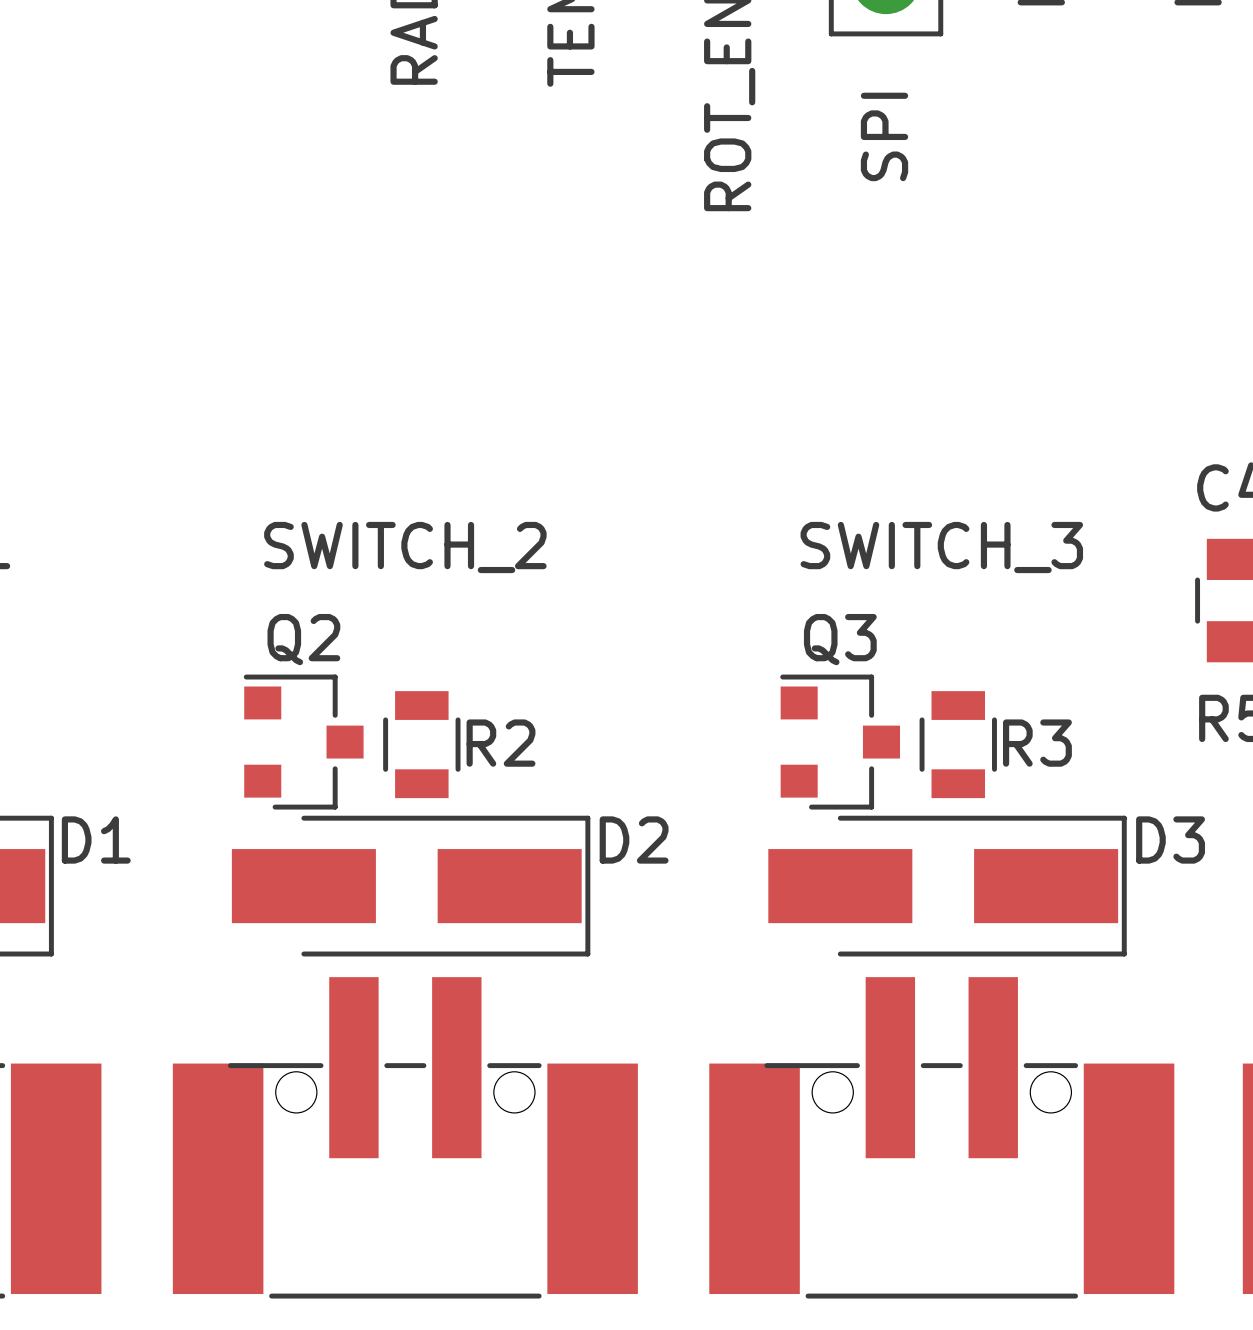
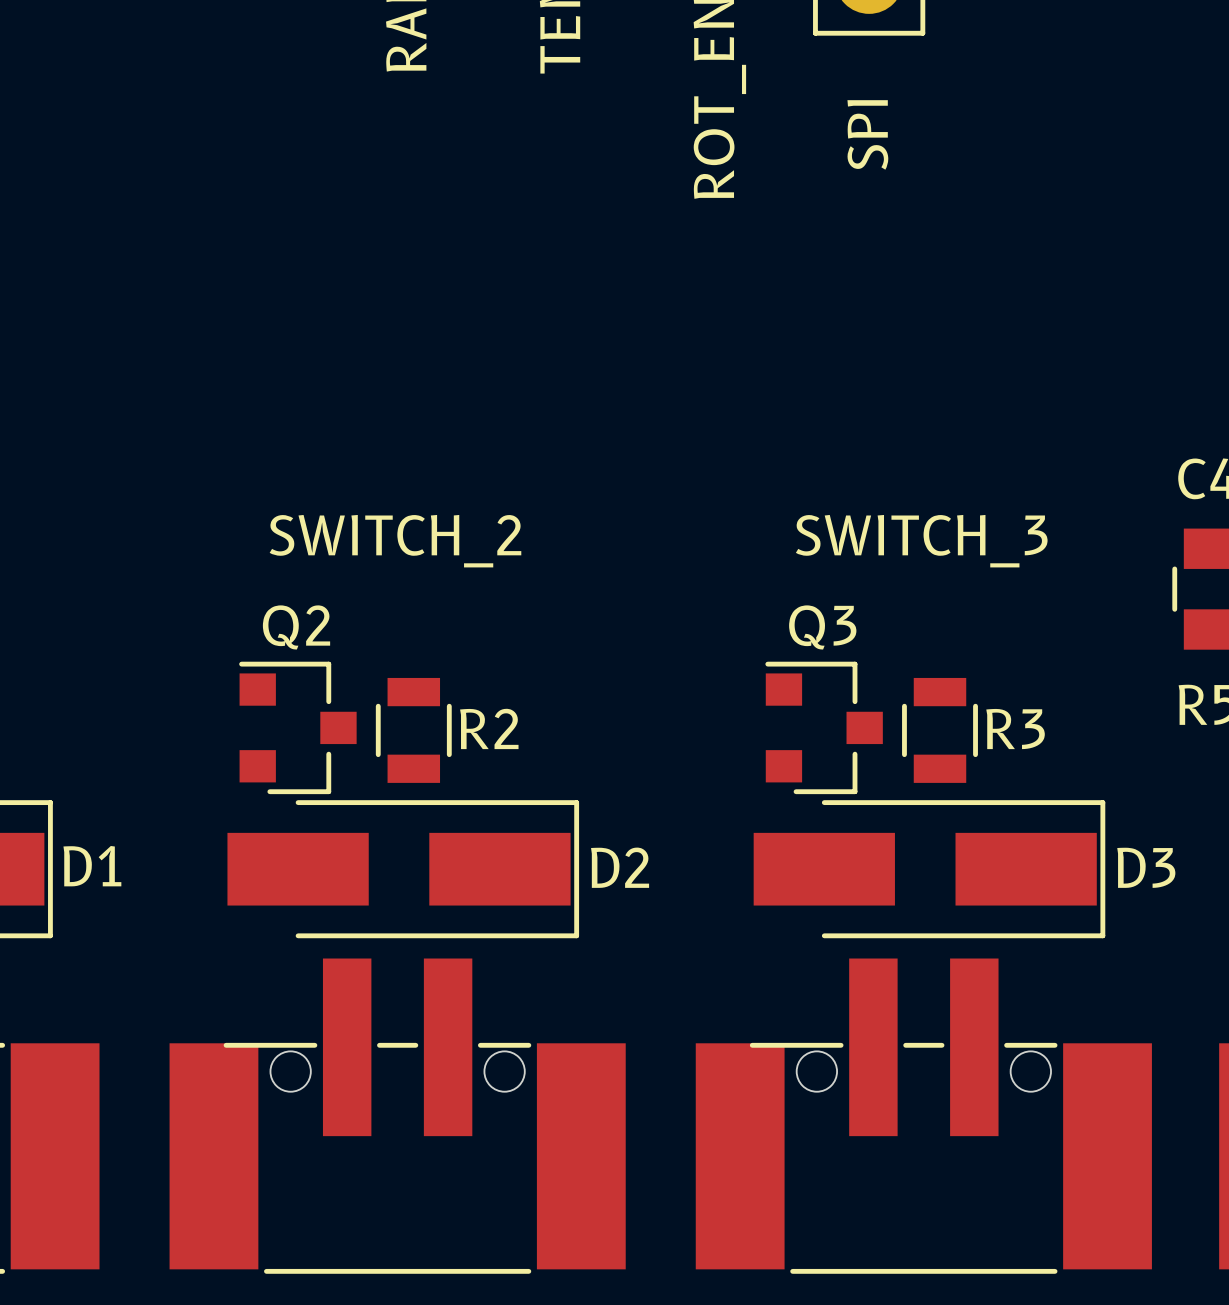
D1 name position: D1 (96, 839) -> D1 (92, 866)
D2 name position: D2 (634, 839) -> D2 (620, 867)
D3 name position: D3 (1170, 839) -> D3 (1146, 867)

